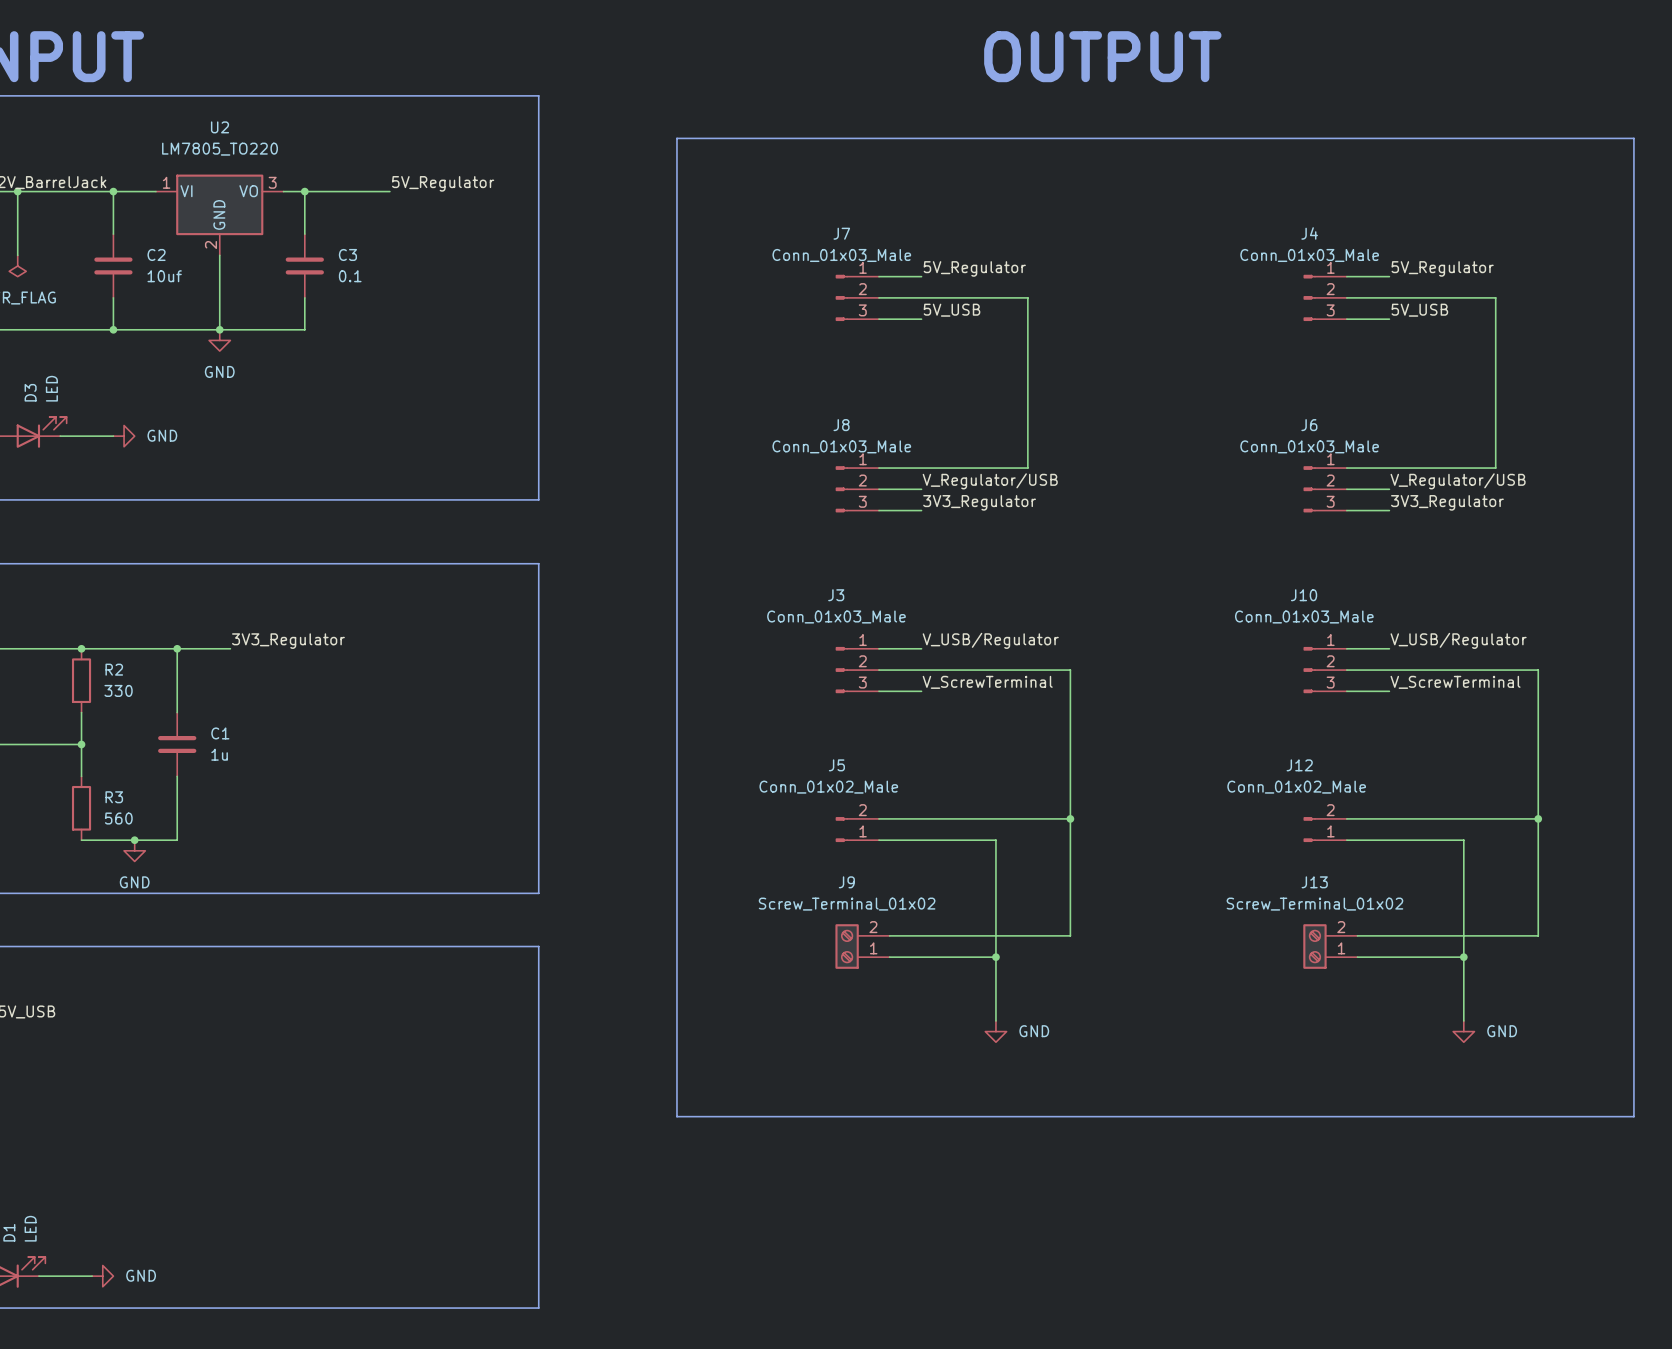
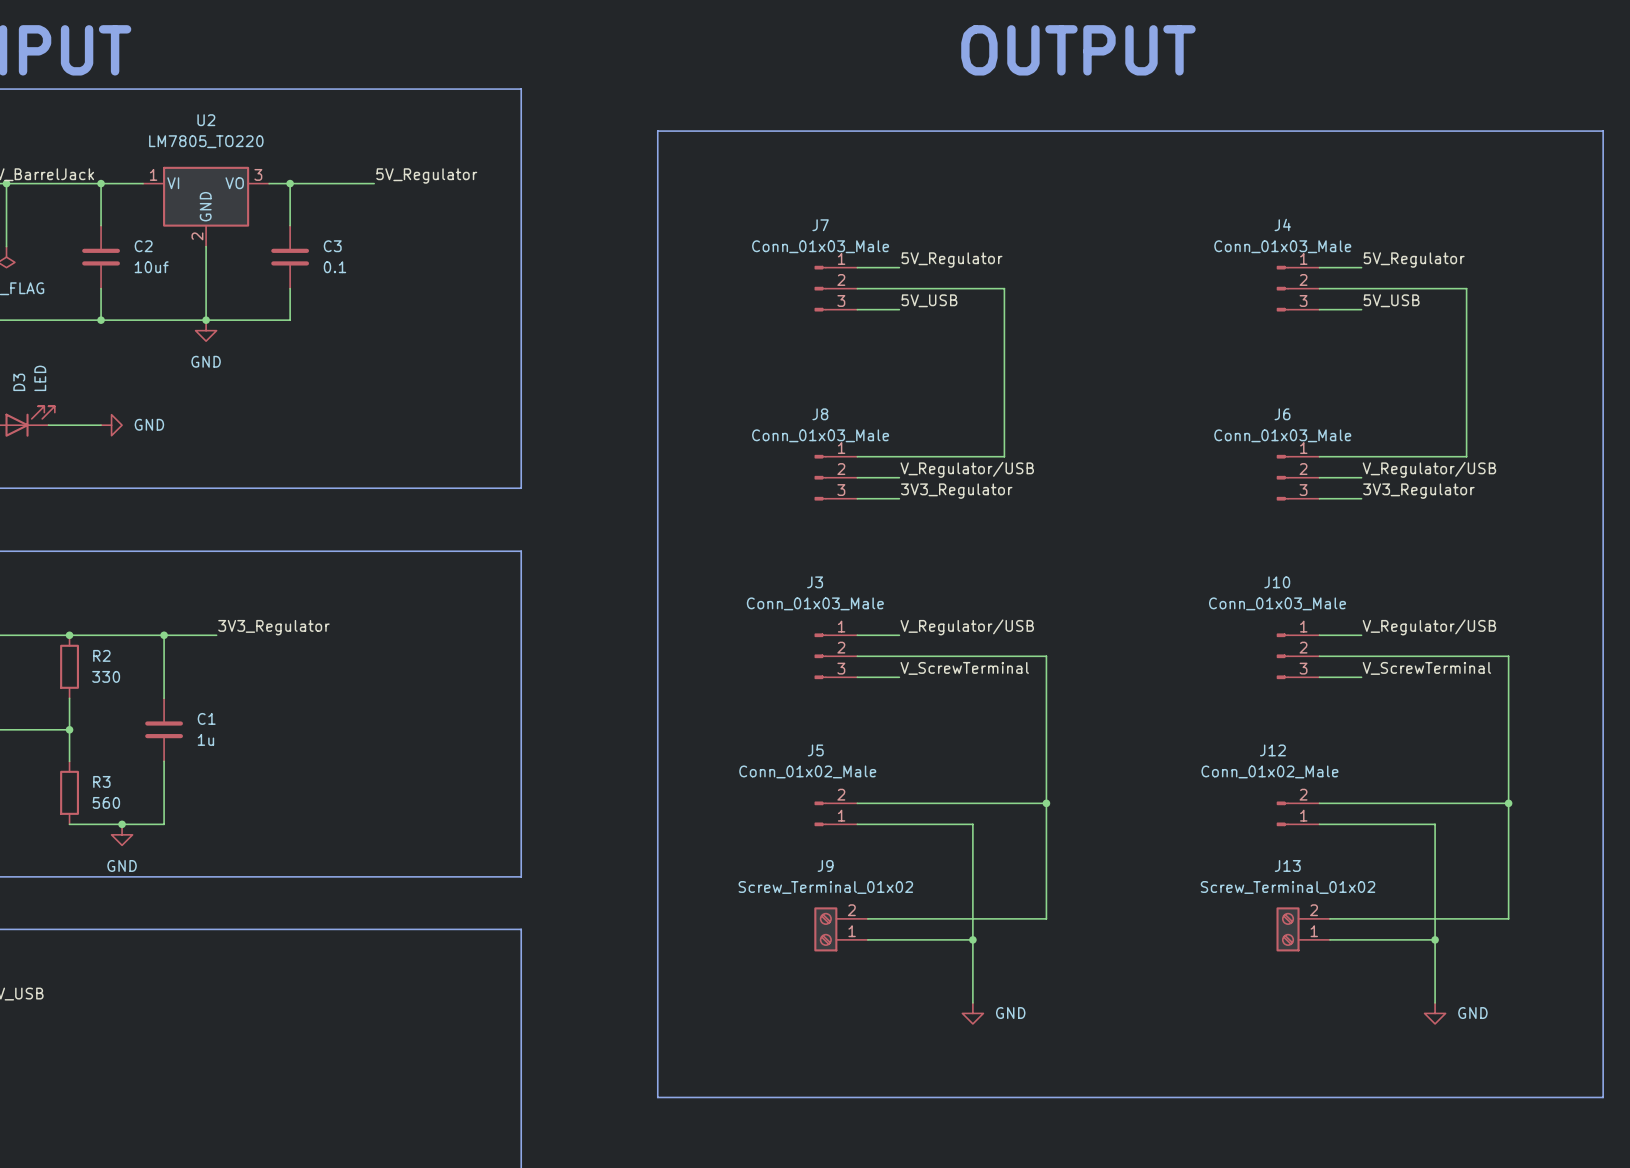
label: V_USB/Regulator (990, 640) -> V_Regulator/USB (967, 627)
label: V_USB/Regulator (1458, 640) -> V_Regulator/USB (1429, 627)

